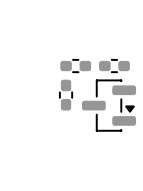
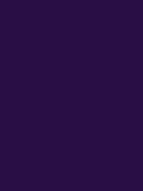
part: (75, 66) -> none
part: (114, 66) -> none
part: (66, 95) -> none
part: (109, 105) -> none

